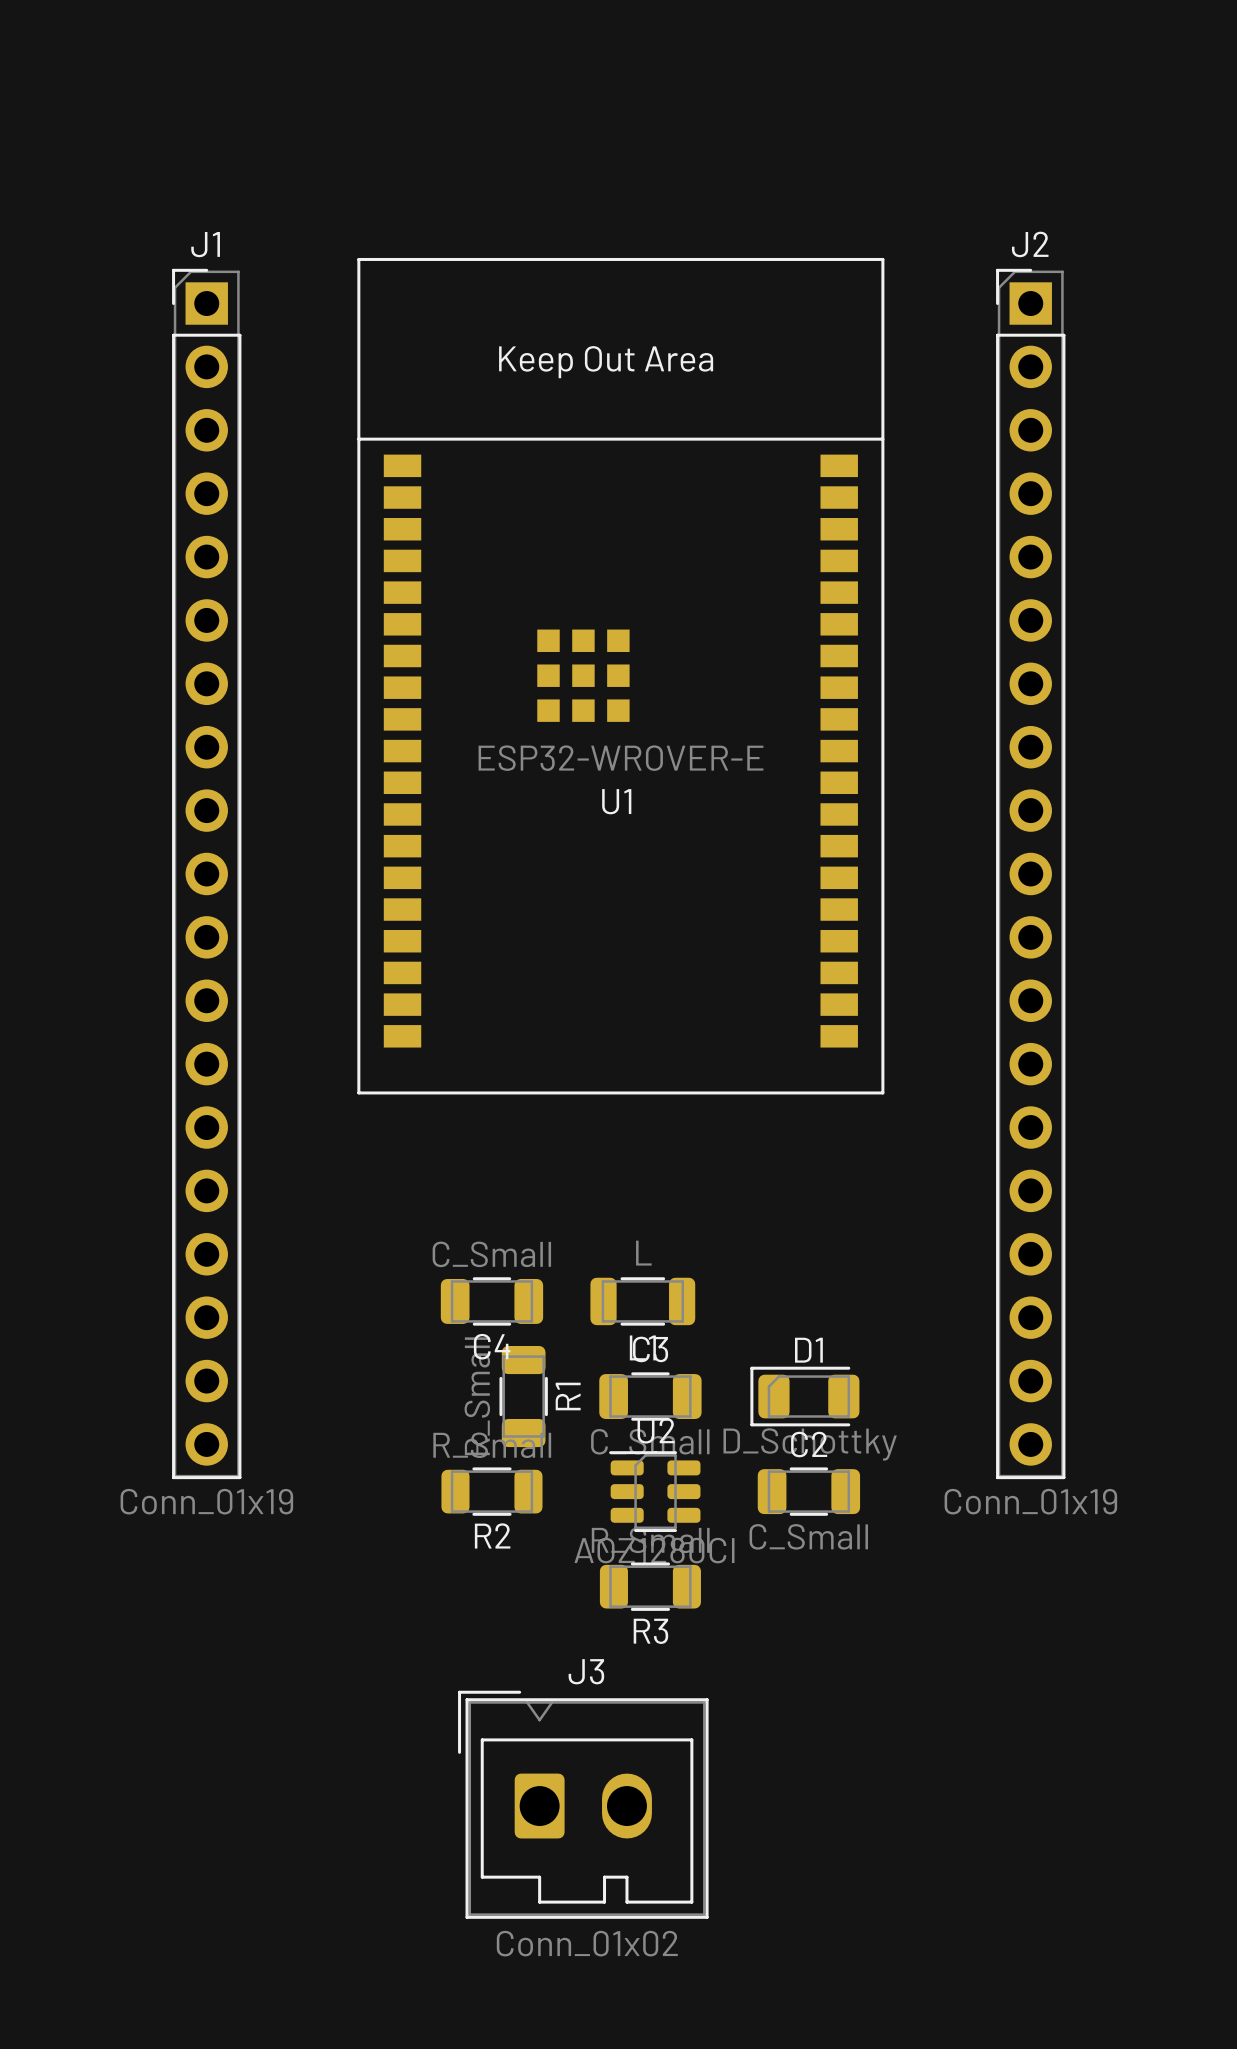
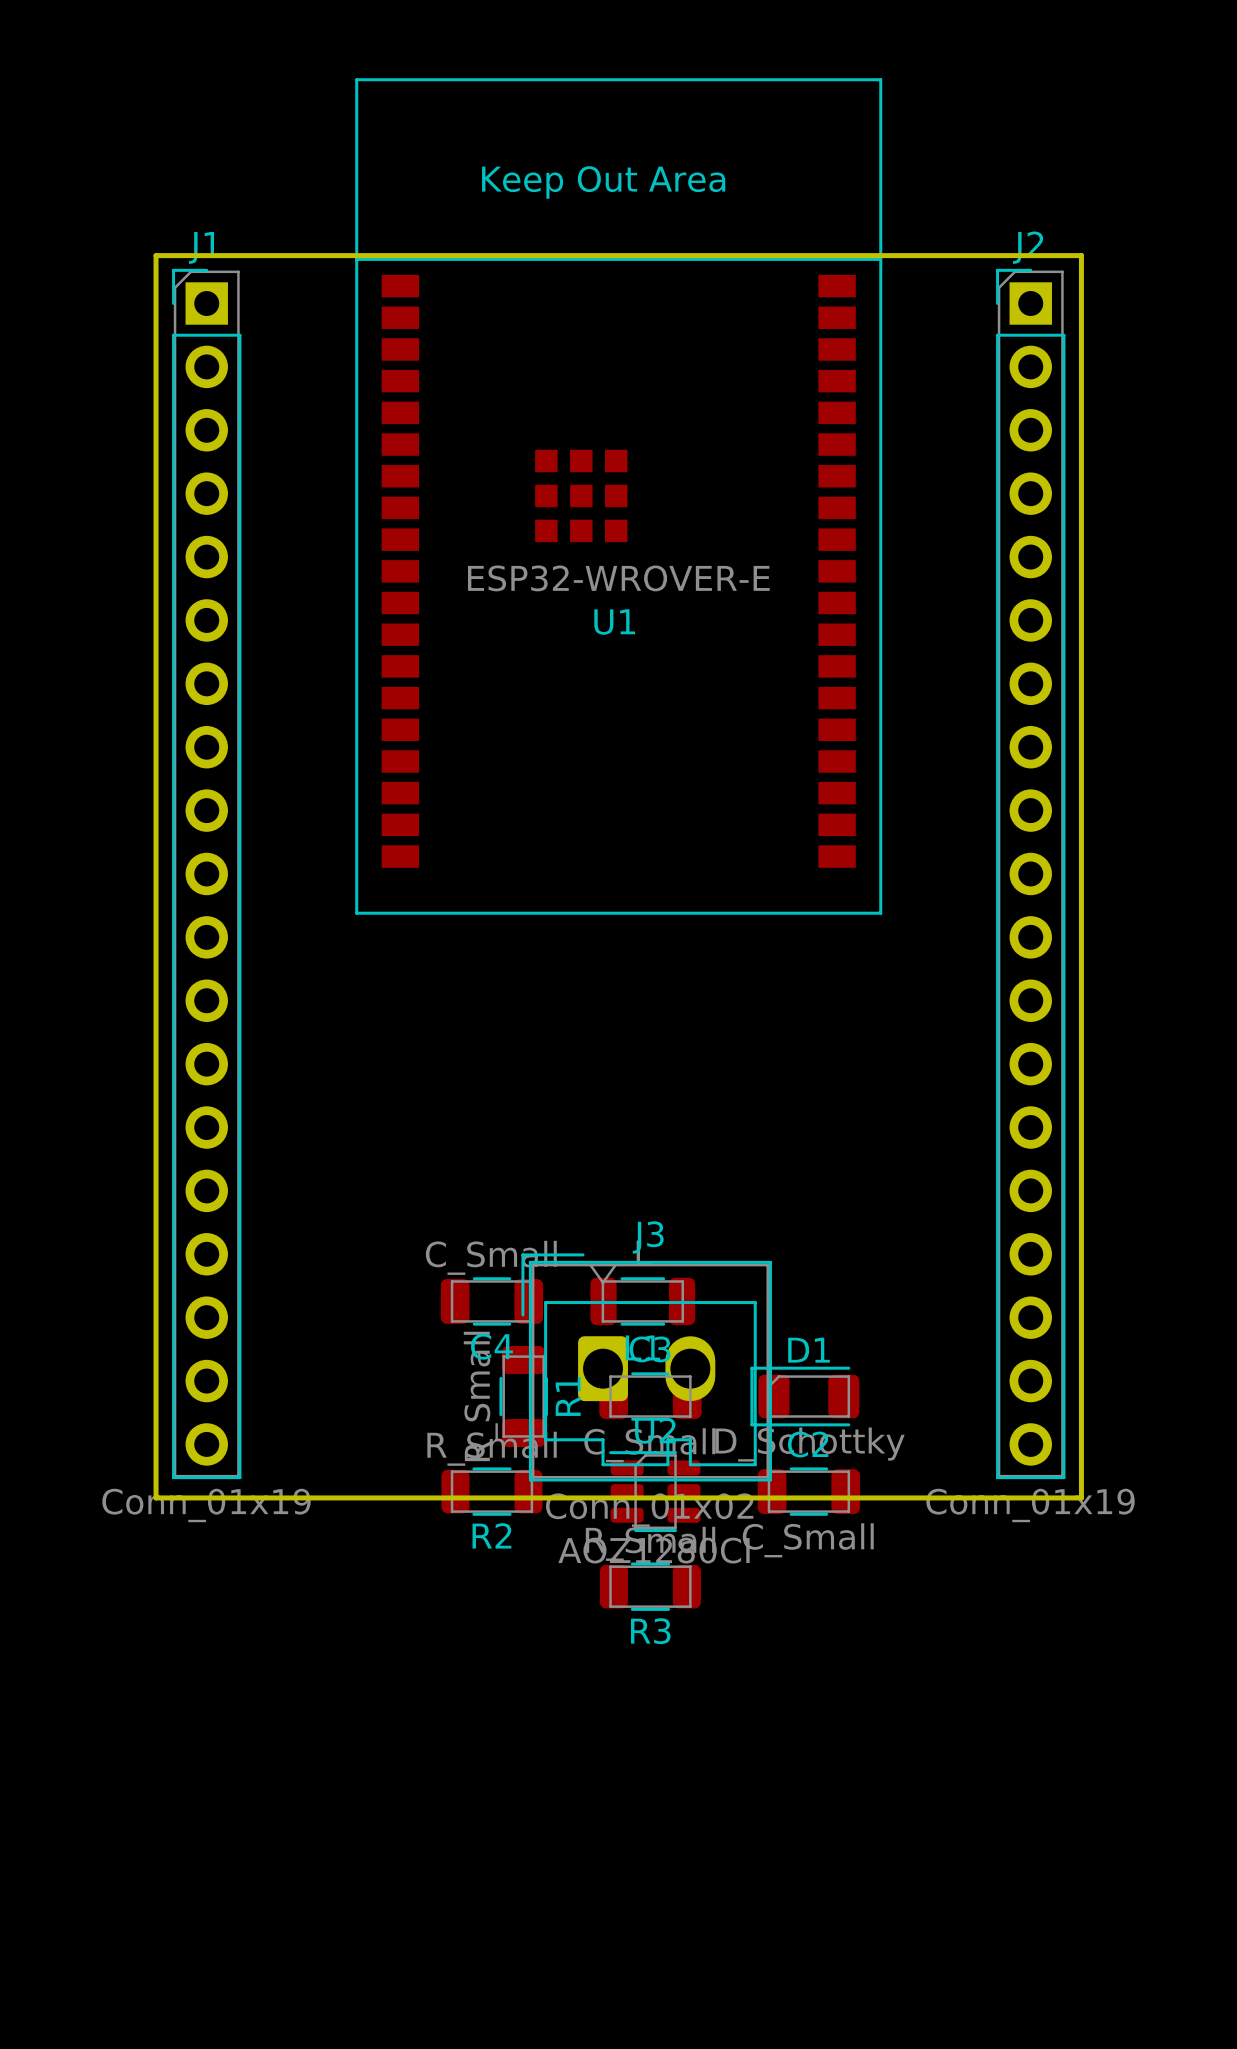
board edge: none -> (156, 255) (1081, 255) (1081, 1497) (156, 1497) (156, 255)
U1 position: (620, 676) -> (618, 496)
J3 position: (583, 1804) -> (646, 1367)

